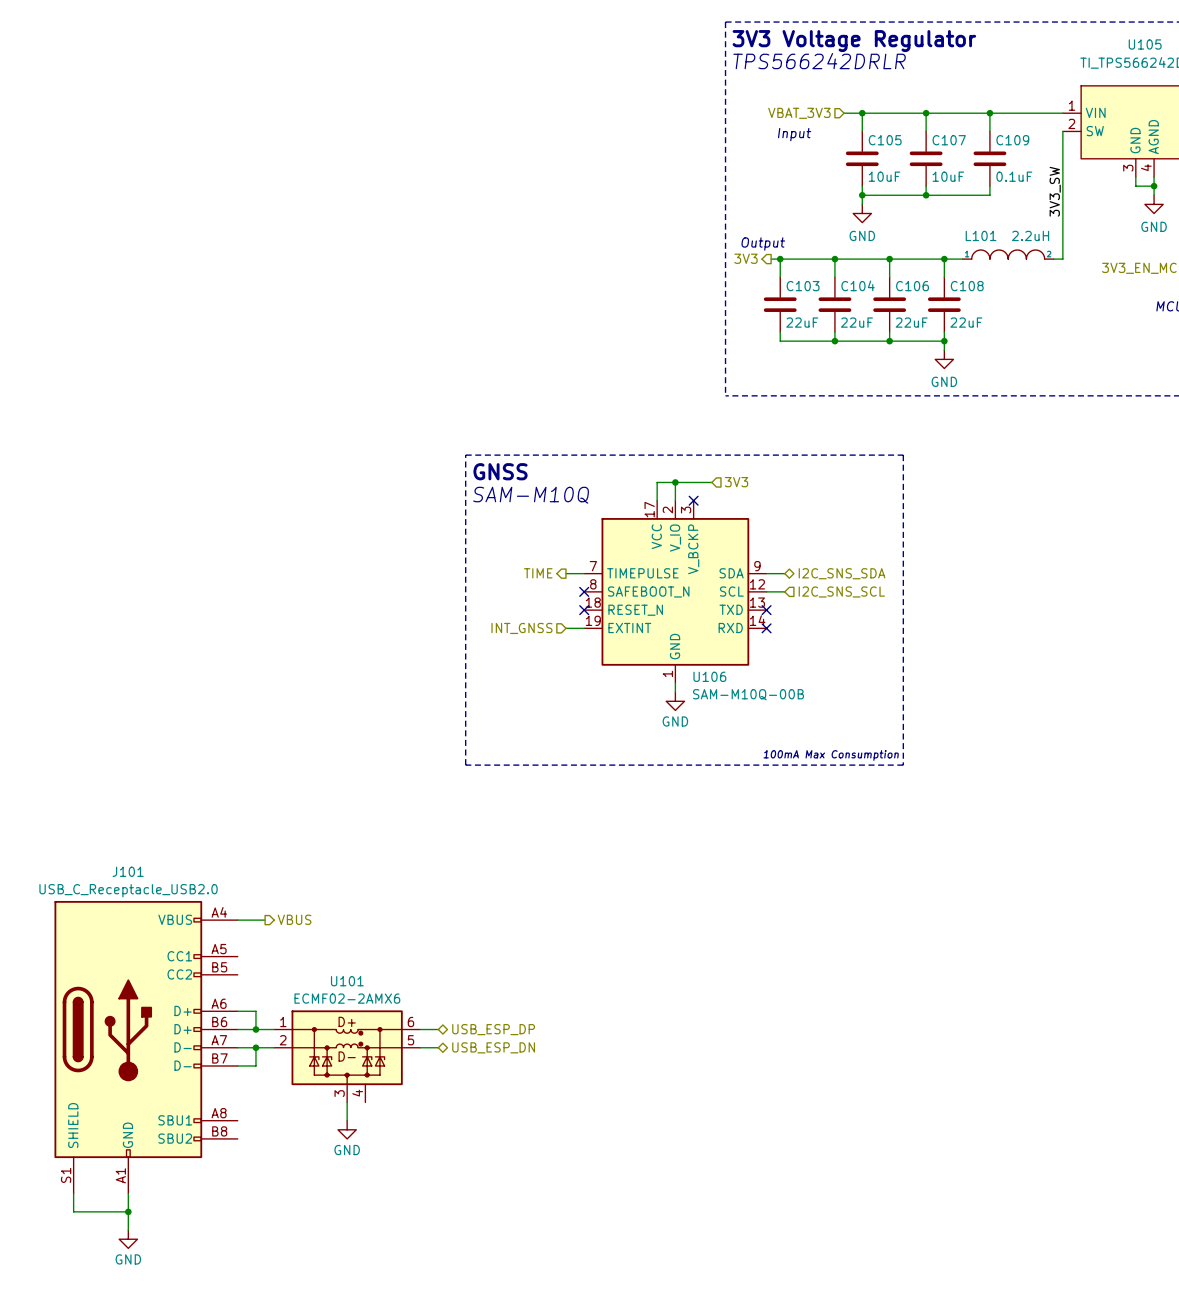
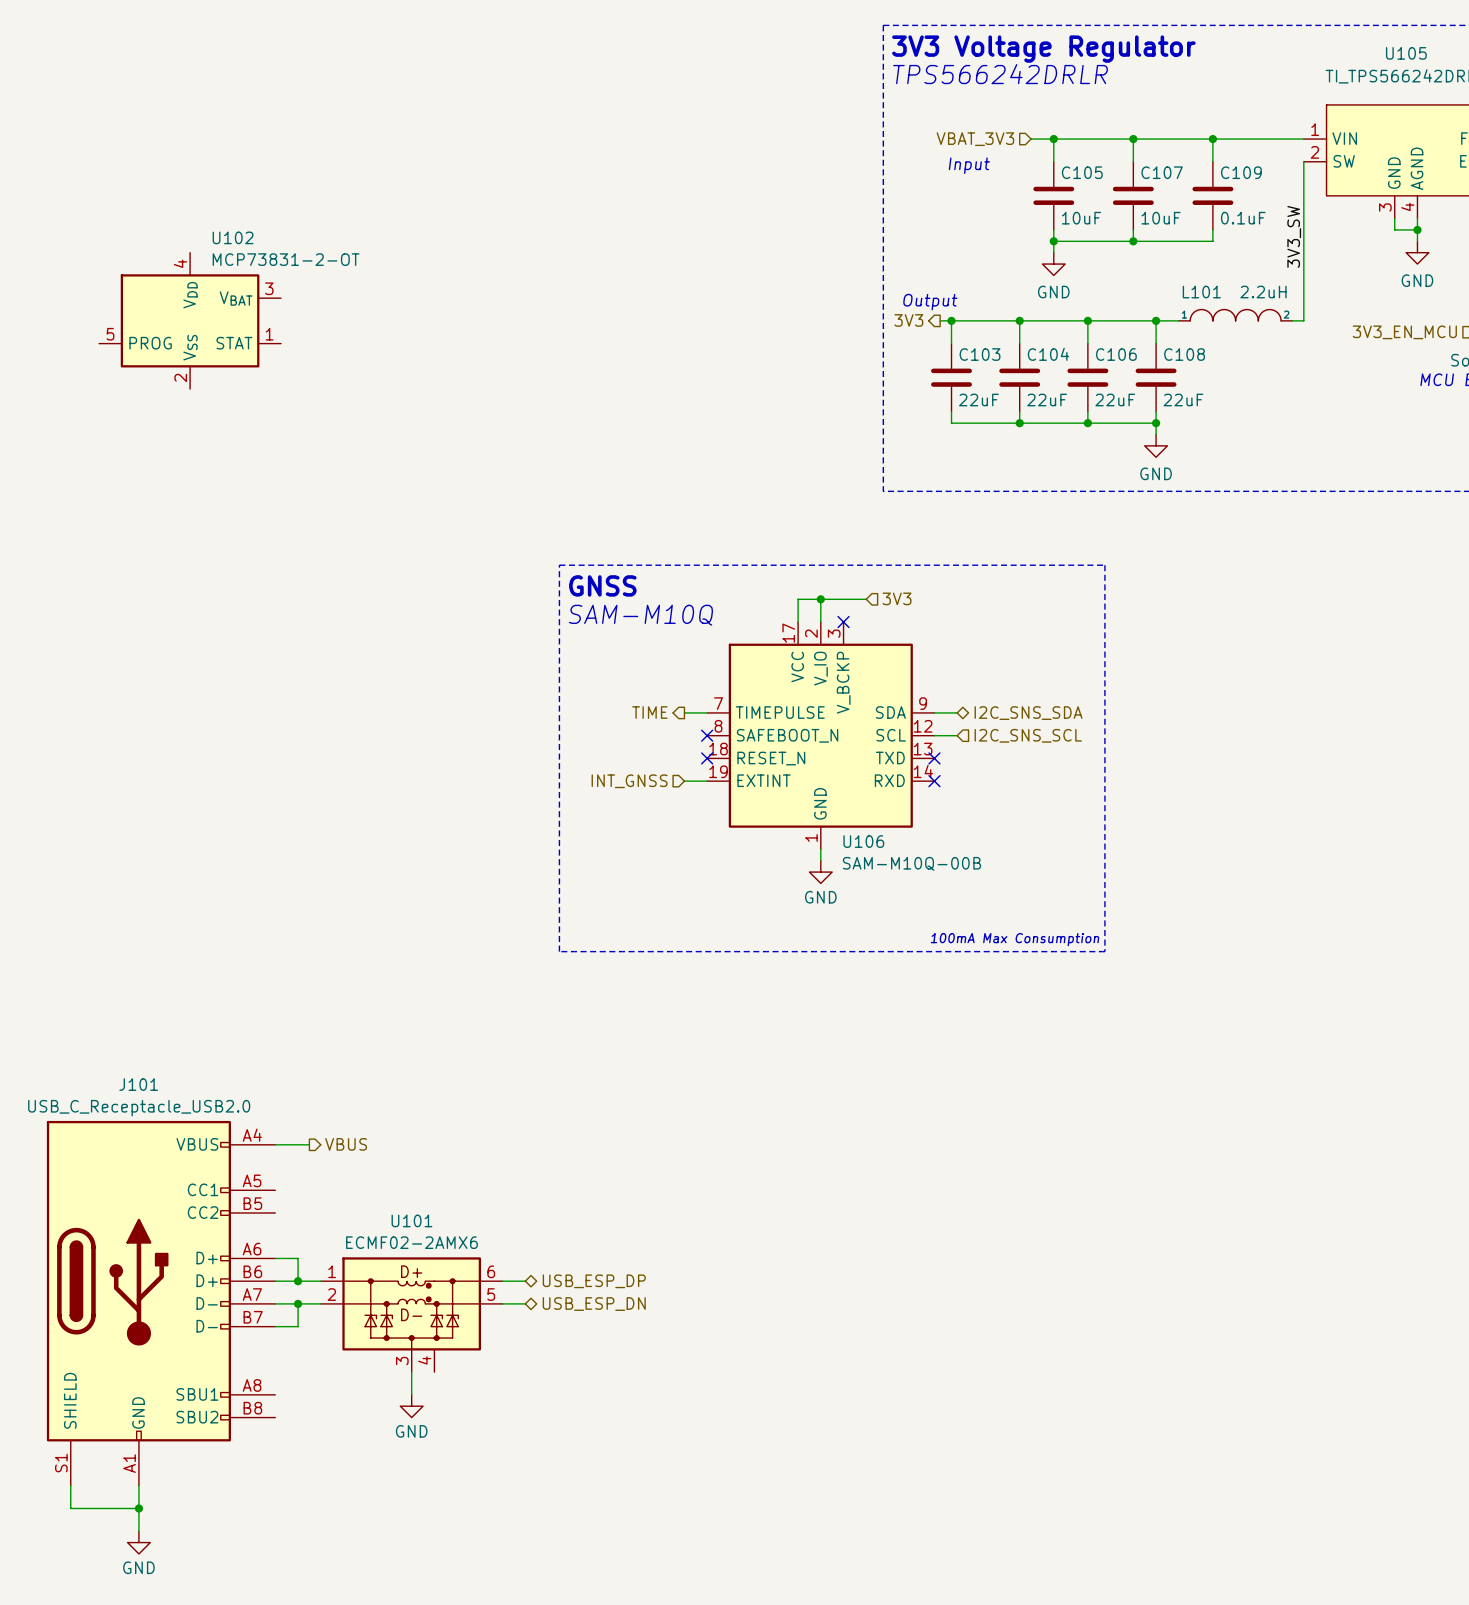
U102: none -> MCP73831-2-OT (190, 320)

